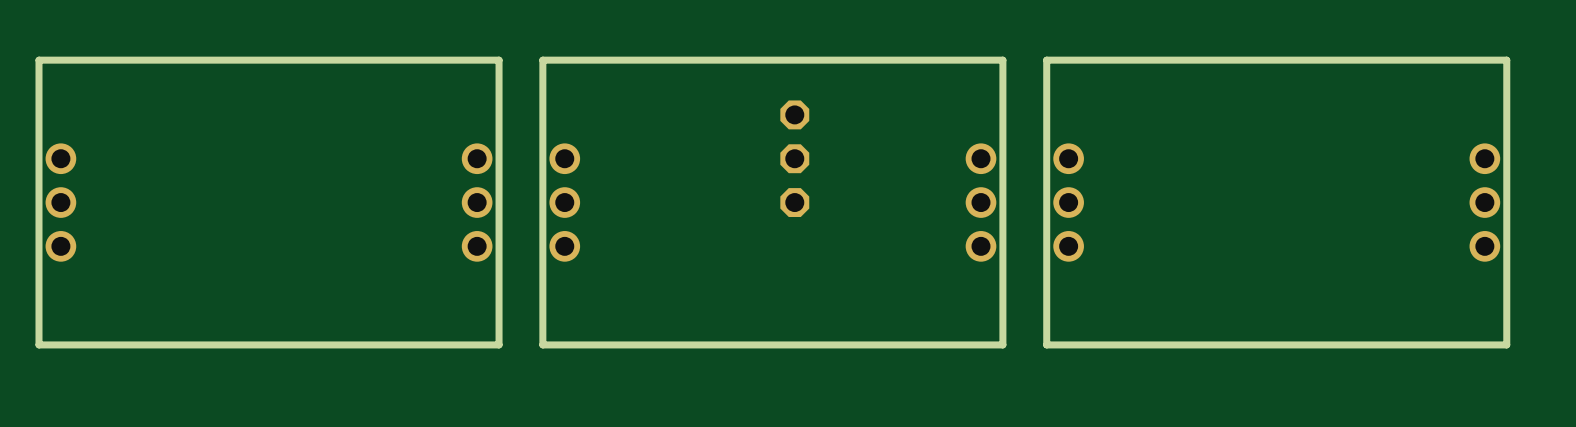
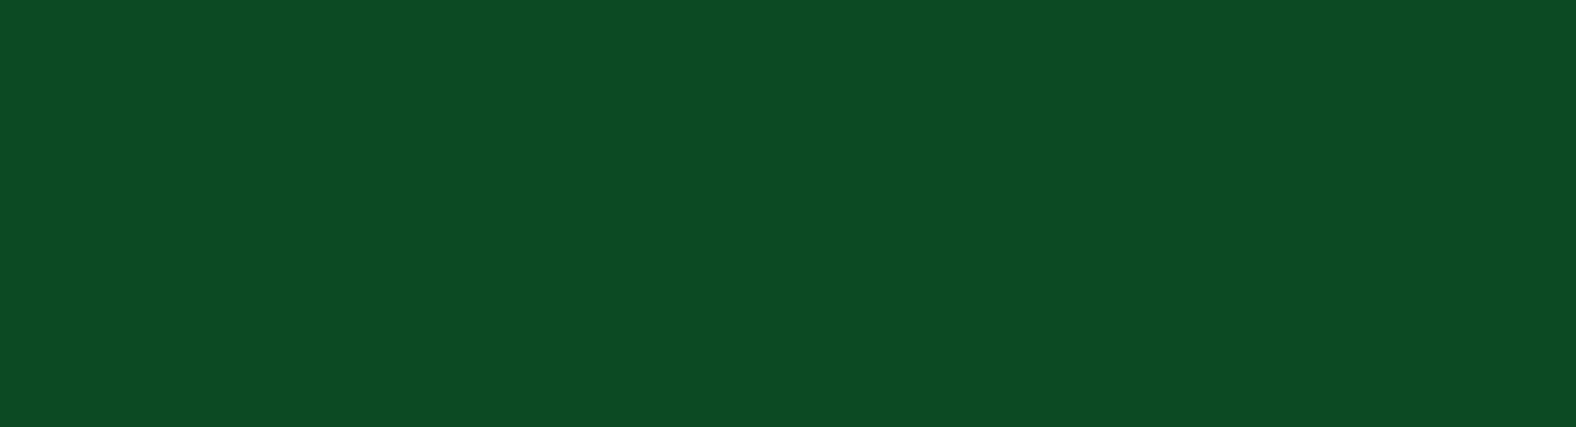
board edge: (499, 60) (38, 60) (38, 344) (499, 344) (499, 60) -> none
board edge: (1002, 60) (542, 60) (542, 344) (1002, 344) (1002, 60) -> none
board edge: (1506, 60) (1046, 60) (1046, 344) (1506, 344) (1506, 60) -> none
part: (794, 158) -> none
part: (60, 202) -> none
part: (477, 202) -> none
part: (564, 202) -> none
part: (981, 202) -> none
part: (1068, 202) -> none
part: (1484, 202) -> none

